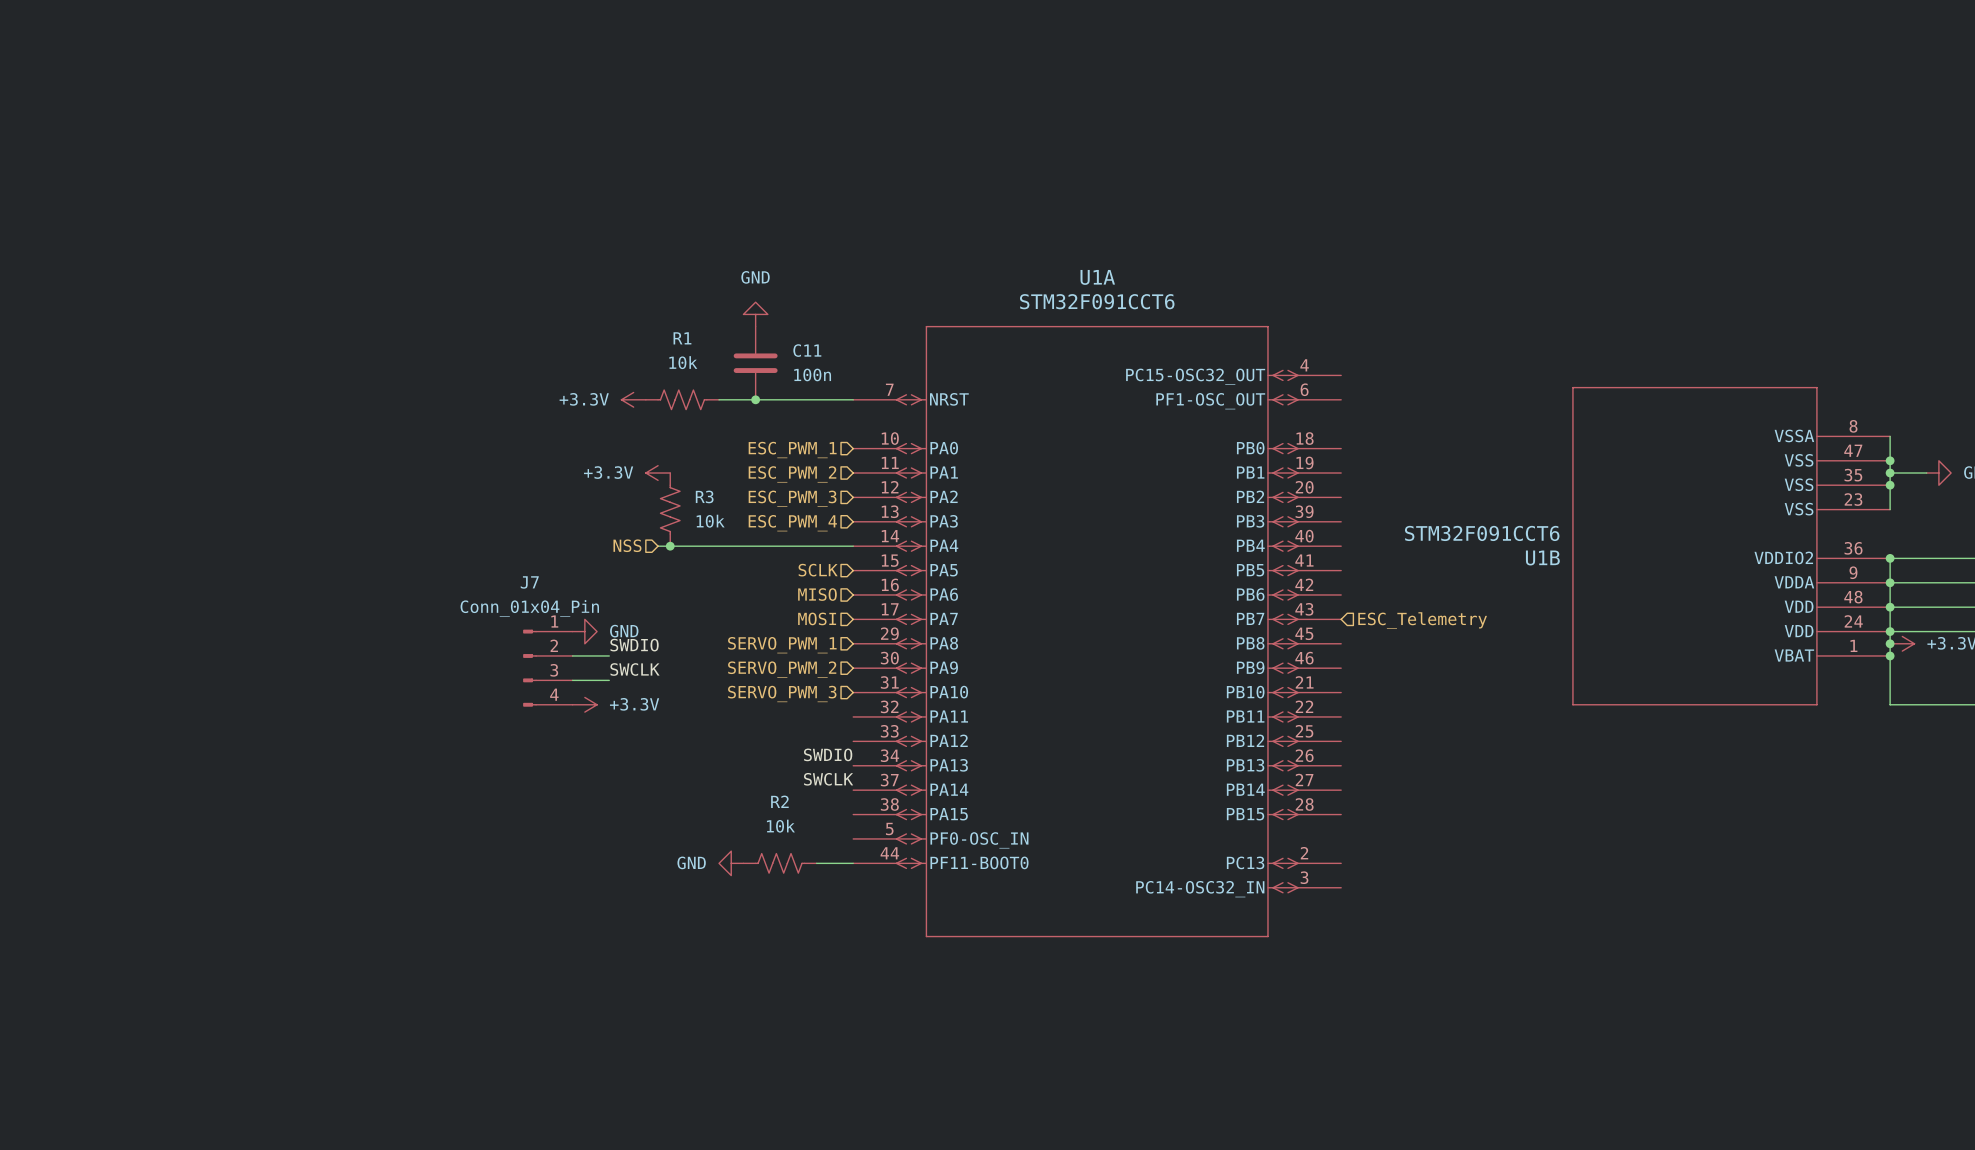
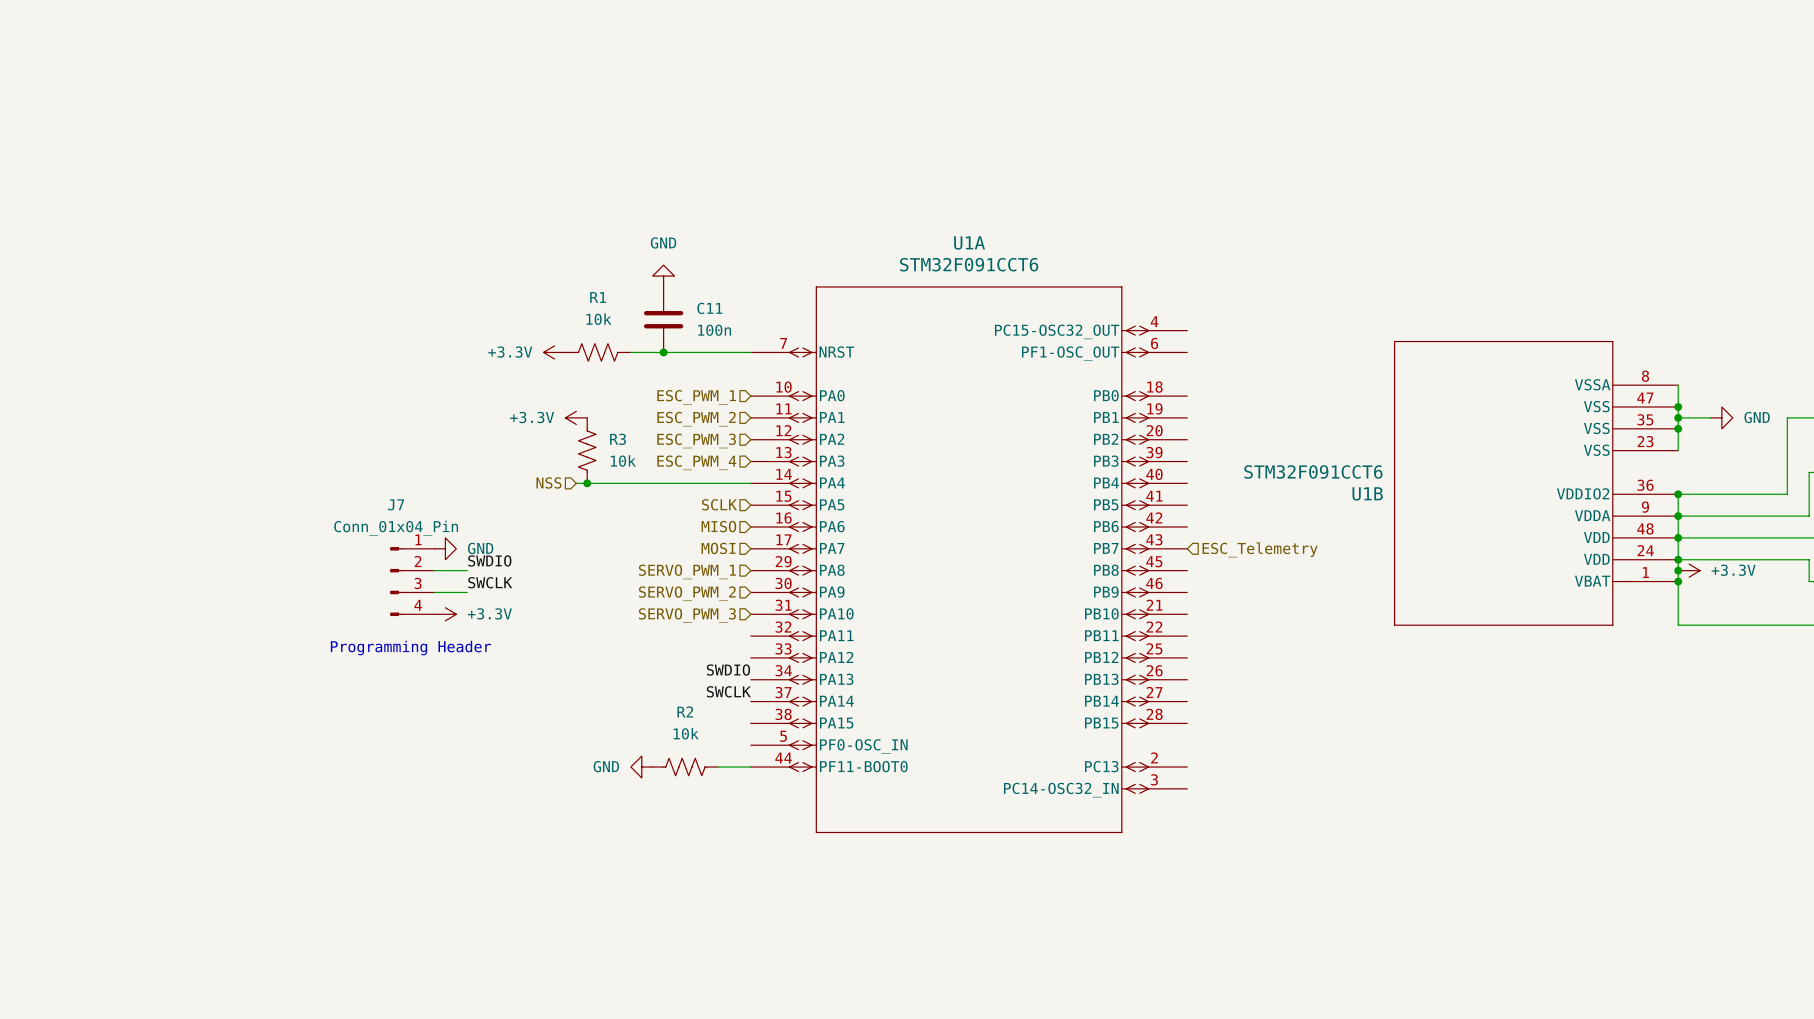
power symbol position: GND (584, 631) -> GND (445, 548)
label position: SWDIO (634, 645) -> SWDIO (489, 560)
wire: (572, 655) (609, 655) -> (434, 570) (467, 570)
J7 position: (547, 668) -> (412, 581)
label position: SWCLK (634, 669) -> SWCLK (490, 582)
wire: (572, 680) (609, 680) -> (434, 592) (467, 592)
power symbol position: +3.3V (584, 704) -> +3.3V (445, 614)
text: none -> Programming Header (410, 648)

